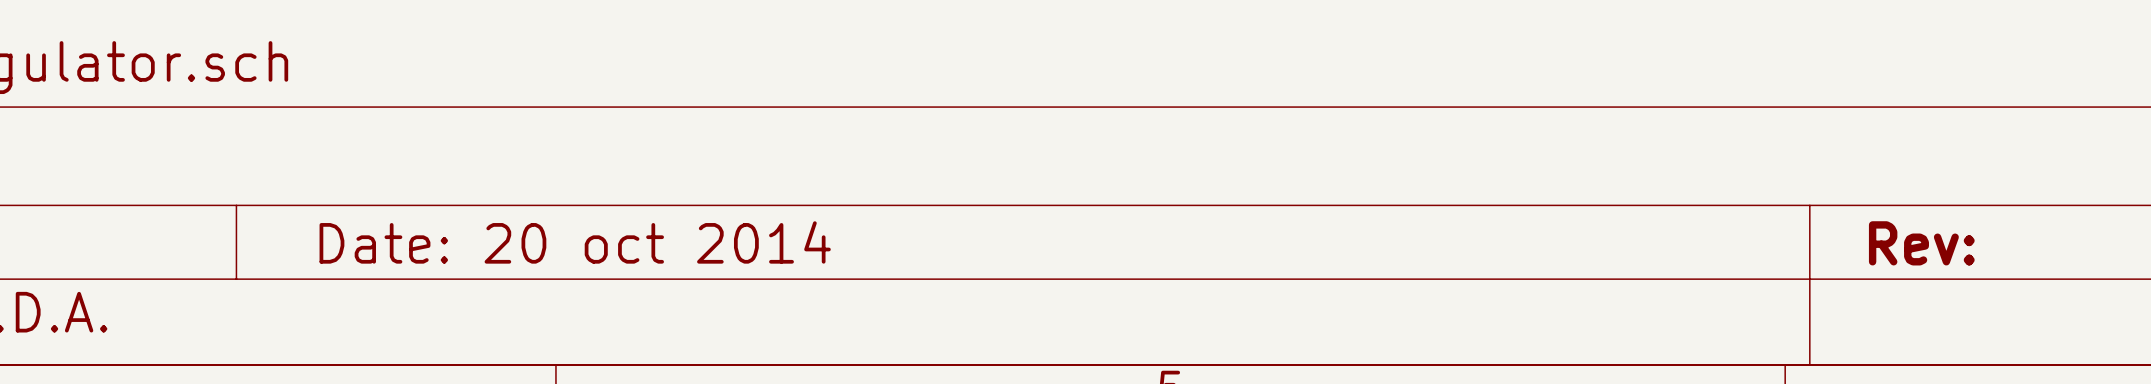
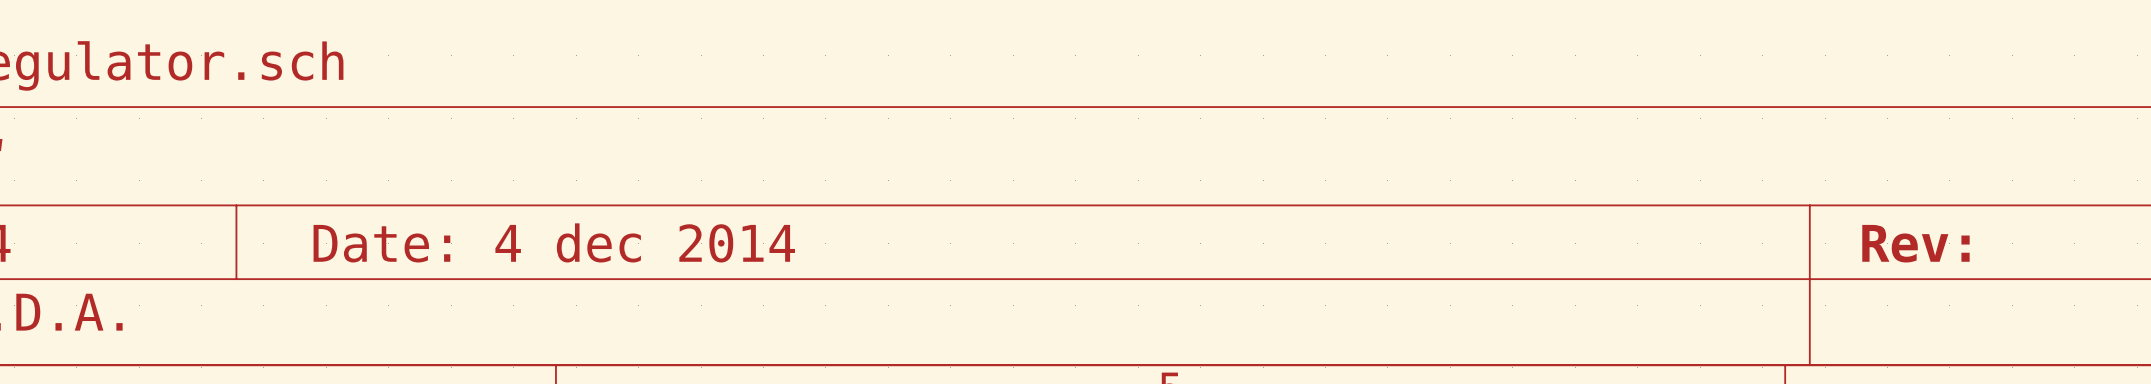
title block: Date: 20 oct 2014 (575, 242) -> Date: 4 dec 2014 (554, 242)

